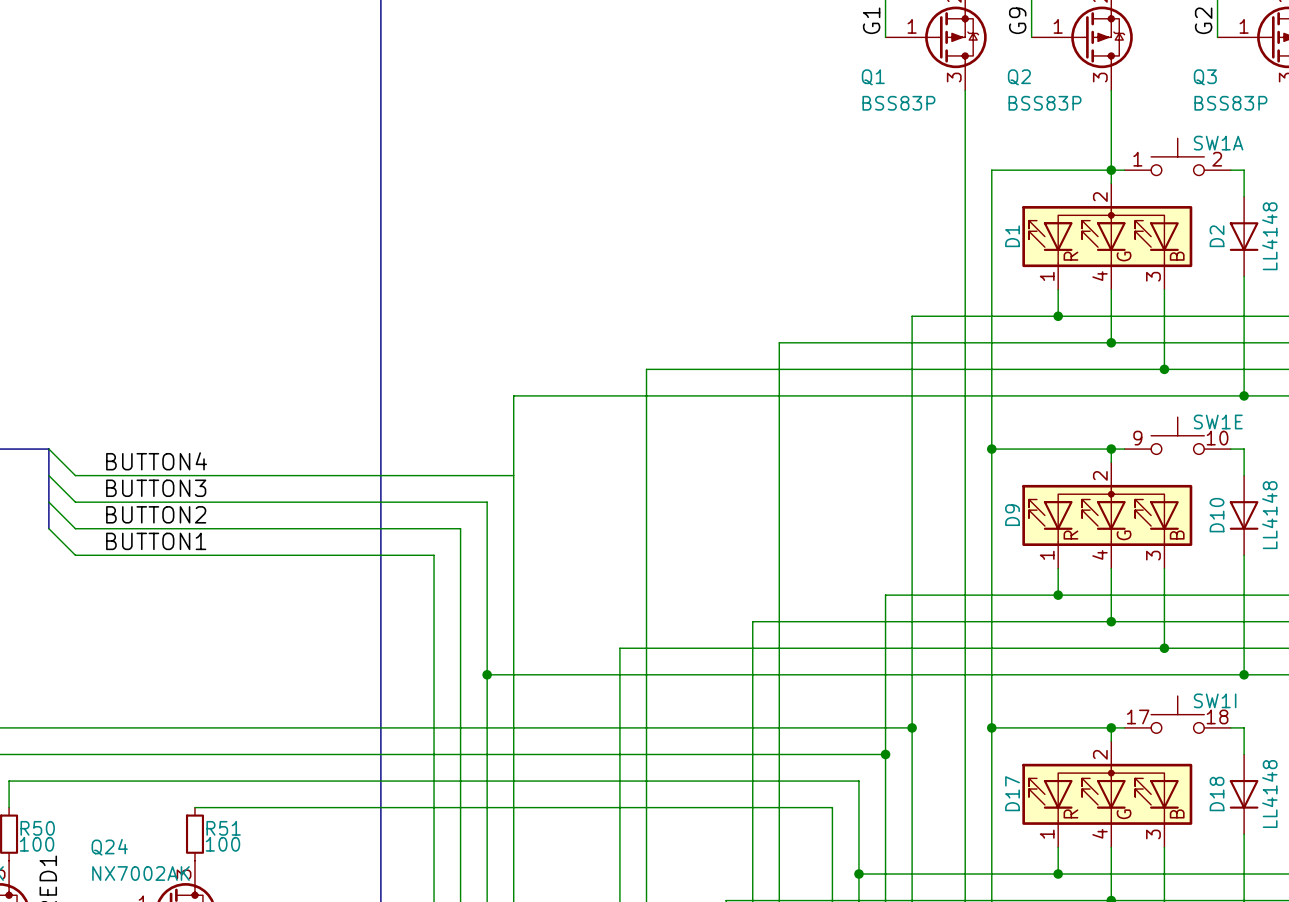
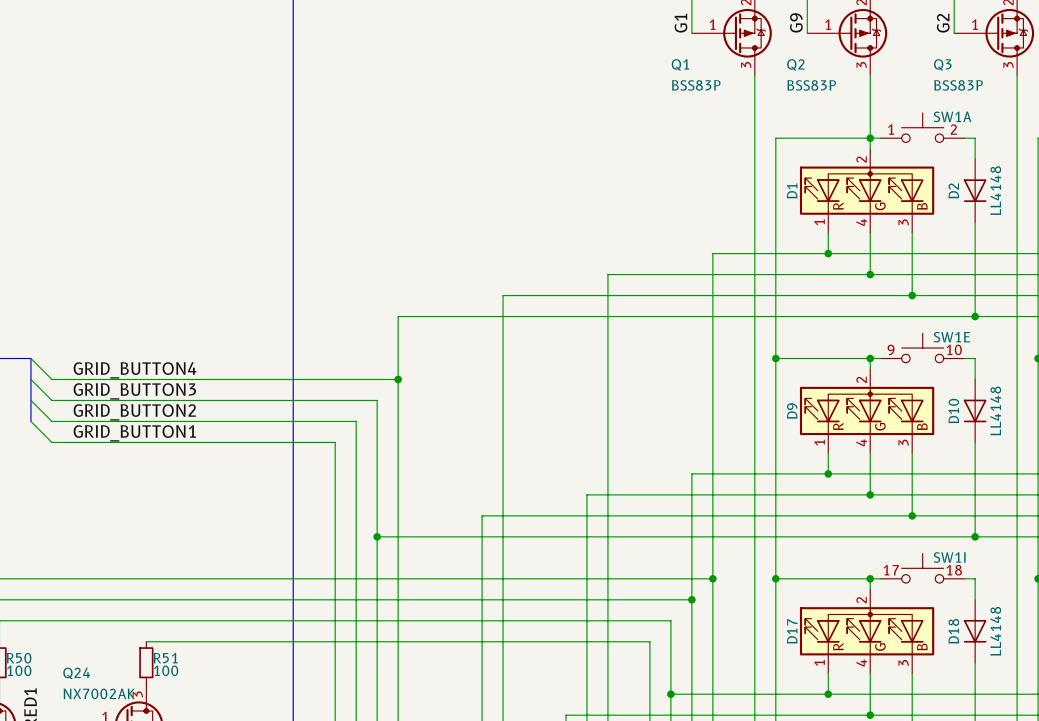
label: BUTTON4 (156, 461) -> GRID_BUTTON4 (134, 370)
junction: none -> (398, 379)
label: BUTTON3 (156, 488) -> GRID_BUTTON3 (134, 391)
label: BUTTON2 (156, 514) -> GRID_BUTTON2 (134, 412)
label: BUTTON1 (156, 541) -> GRID_BUTTON1 (134, 433)

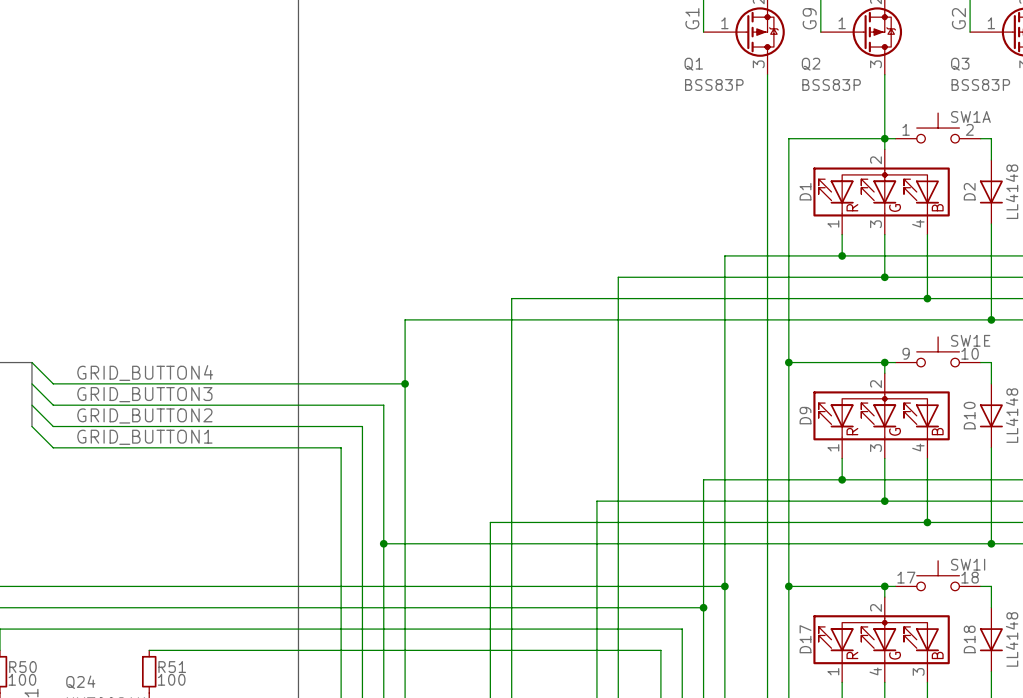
D1 pin number: 4 (861, 222) -> 3 (875, 224)
D1 pin number: 3 (903, 222) -> 4 (918, 223)
D9 pin number: 4 (861, 442) -> 3 (875, 448)
D9 pin number: 3 (903, 442) -> 4 (918, 447)

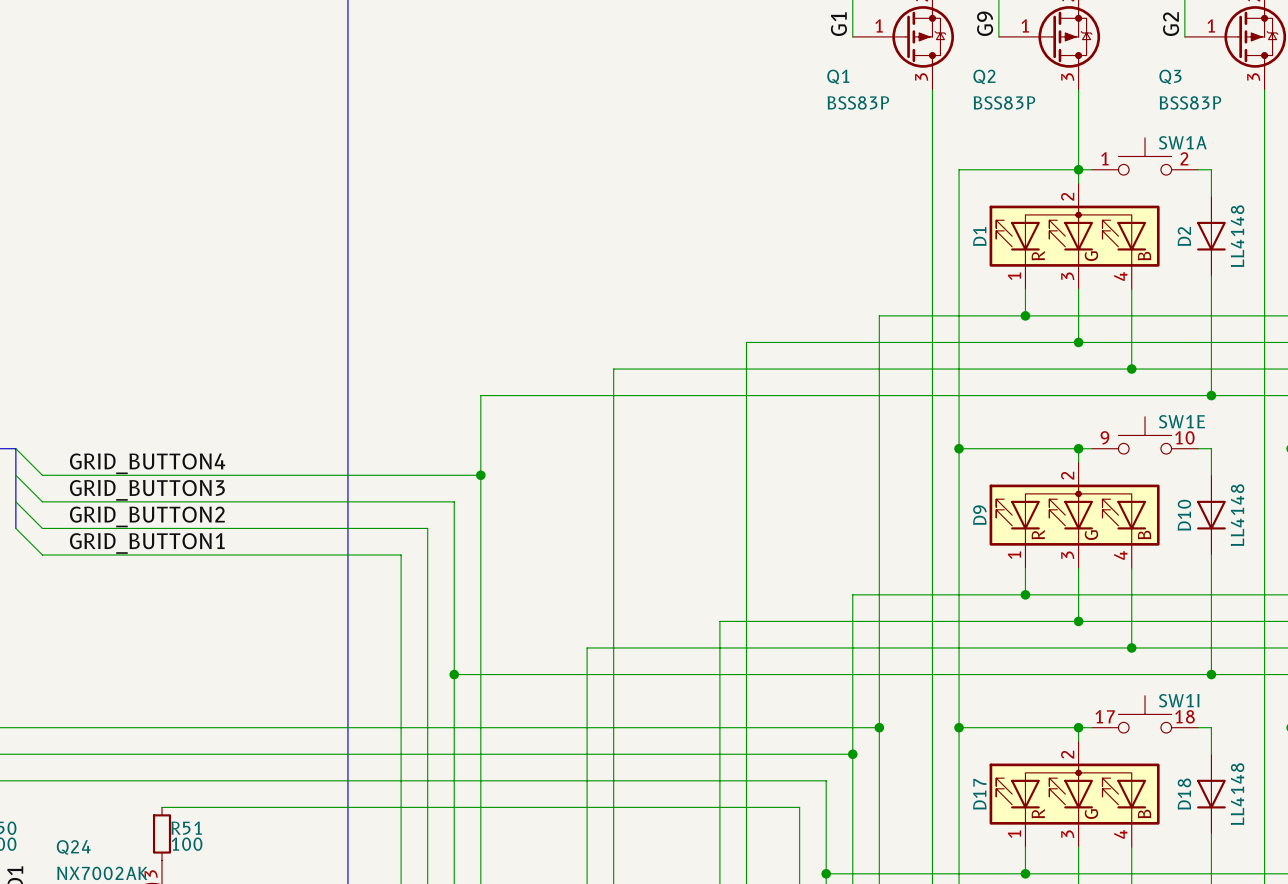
D17 pin number: 4 (875, 671) -> 3 (1067, 834)
D17 pin number: 3 (918, 671) -> 4 (1120, 834)

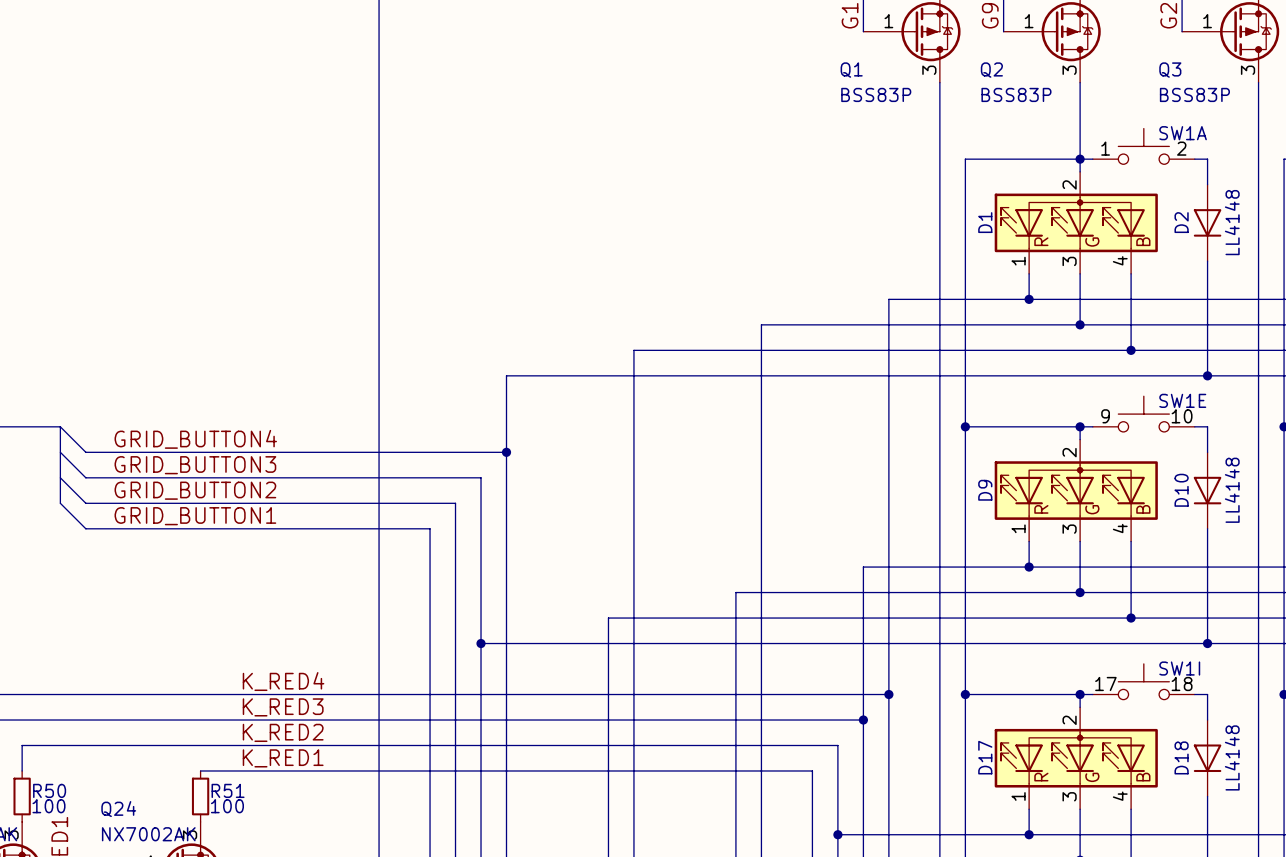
label: none -> K_RED4 (283, 681)
label: none -> K_RED3 (283, 707)
label: none -> K_RED2 (283, 732)
label: none -> K_RED1 (283, 758)

